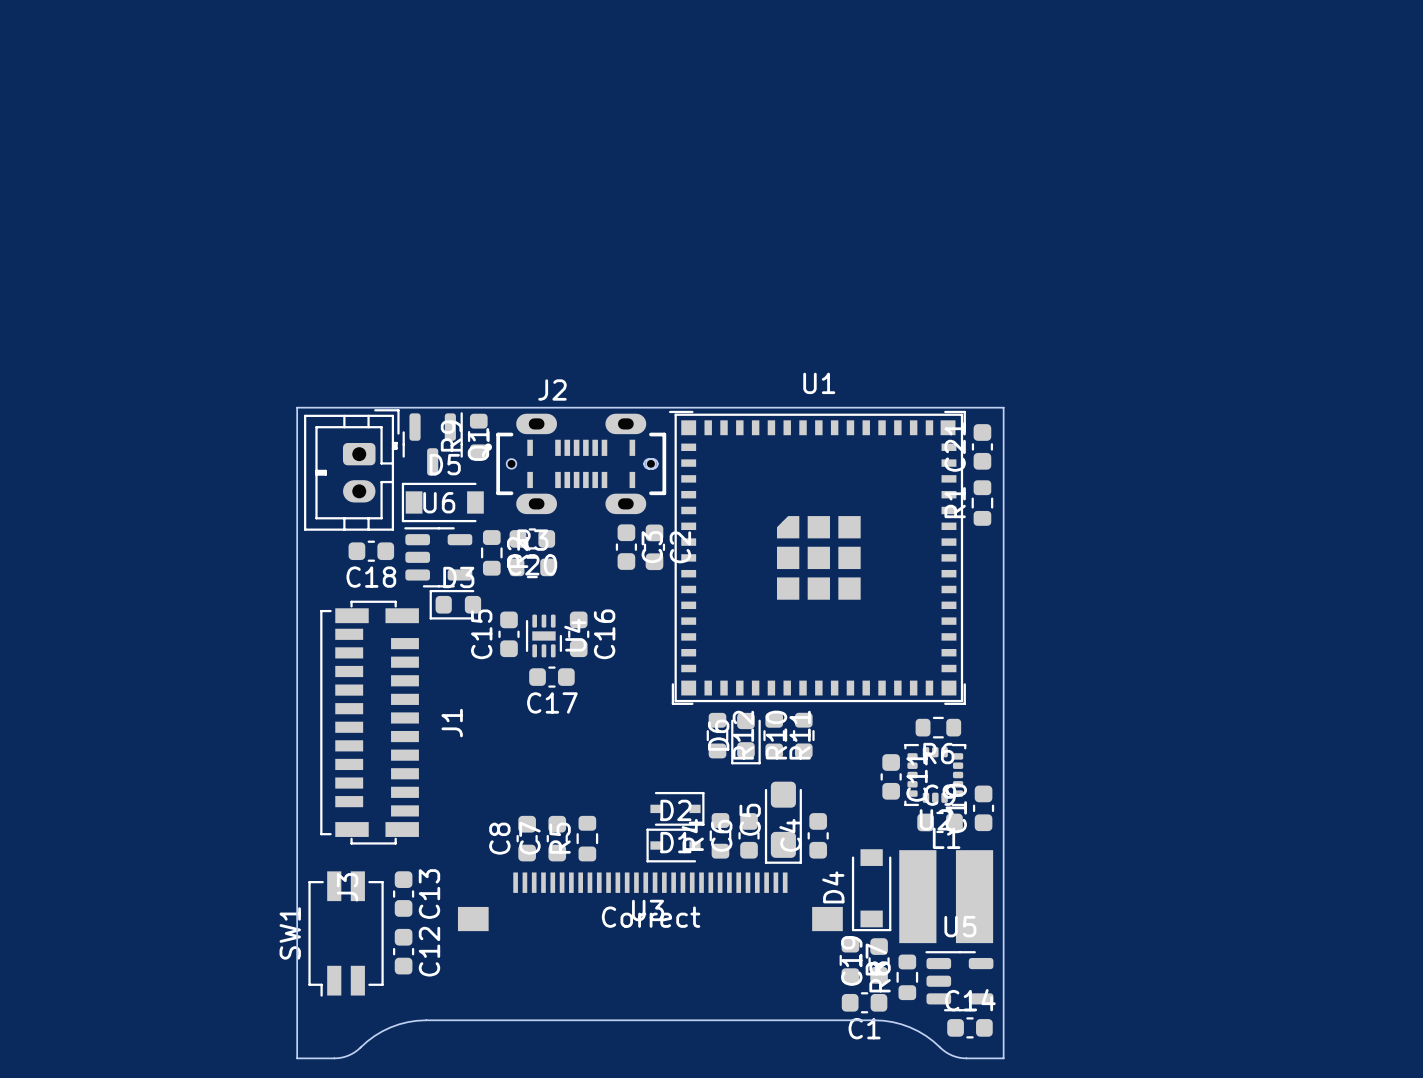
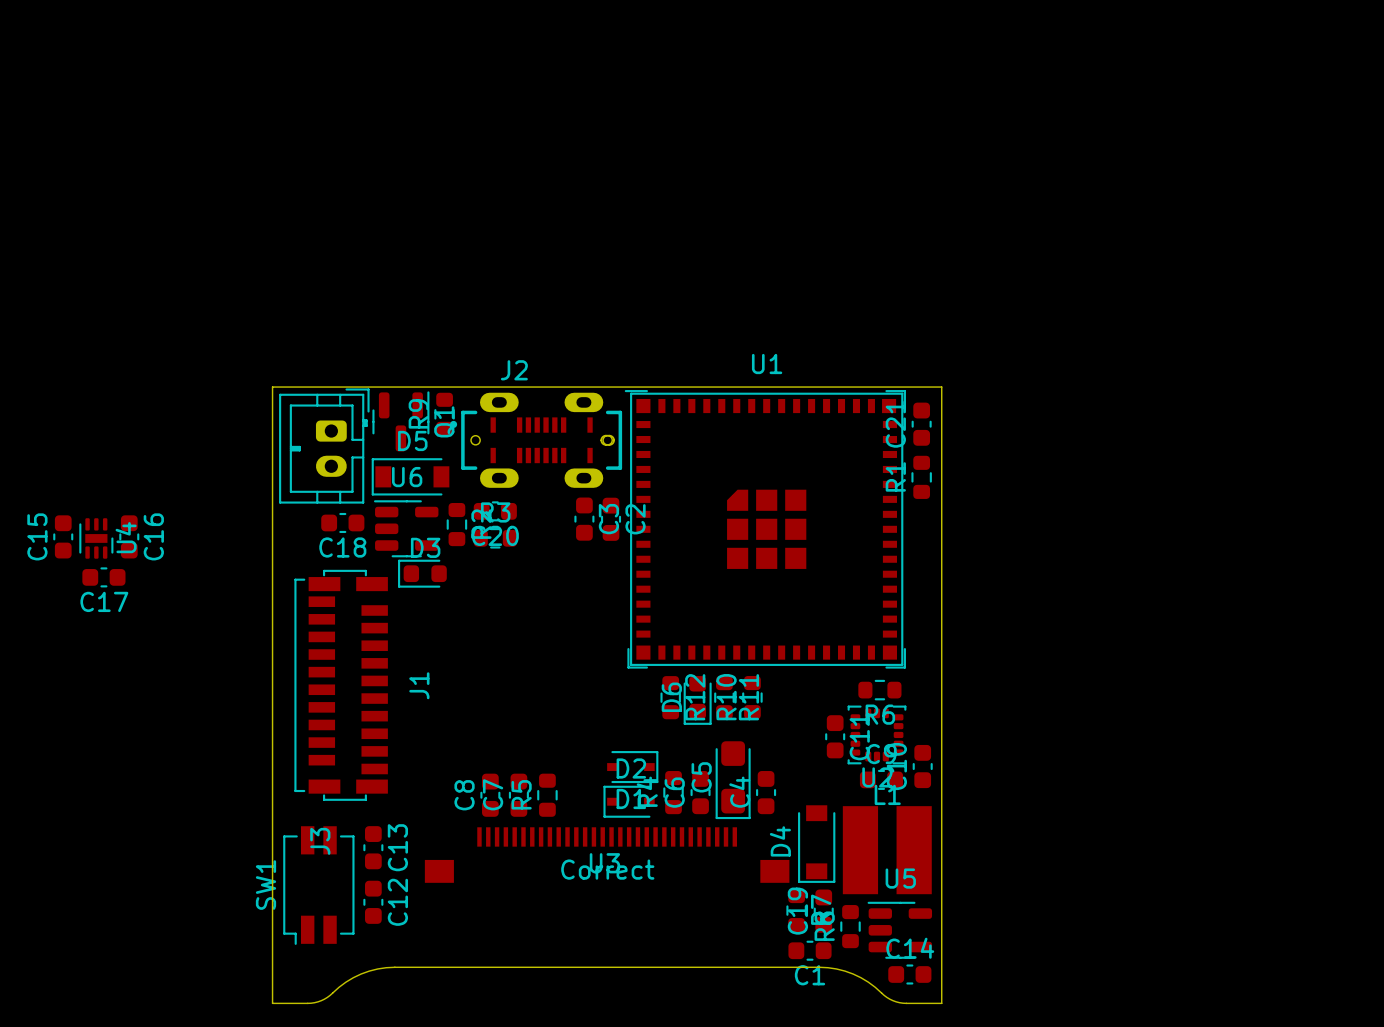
C15 position: (509, 634) -> (63, 536)
C16 position: (578, 634) -> (129, 536)
U4 position: (543, 635) -> (96, 538)
C17 position: (551, 677) -> (103, 577)

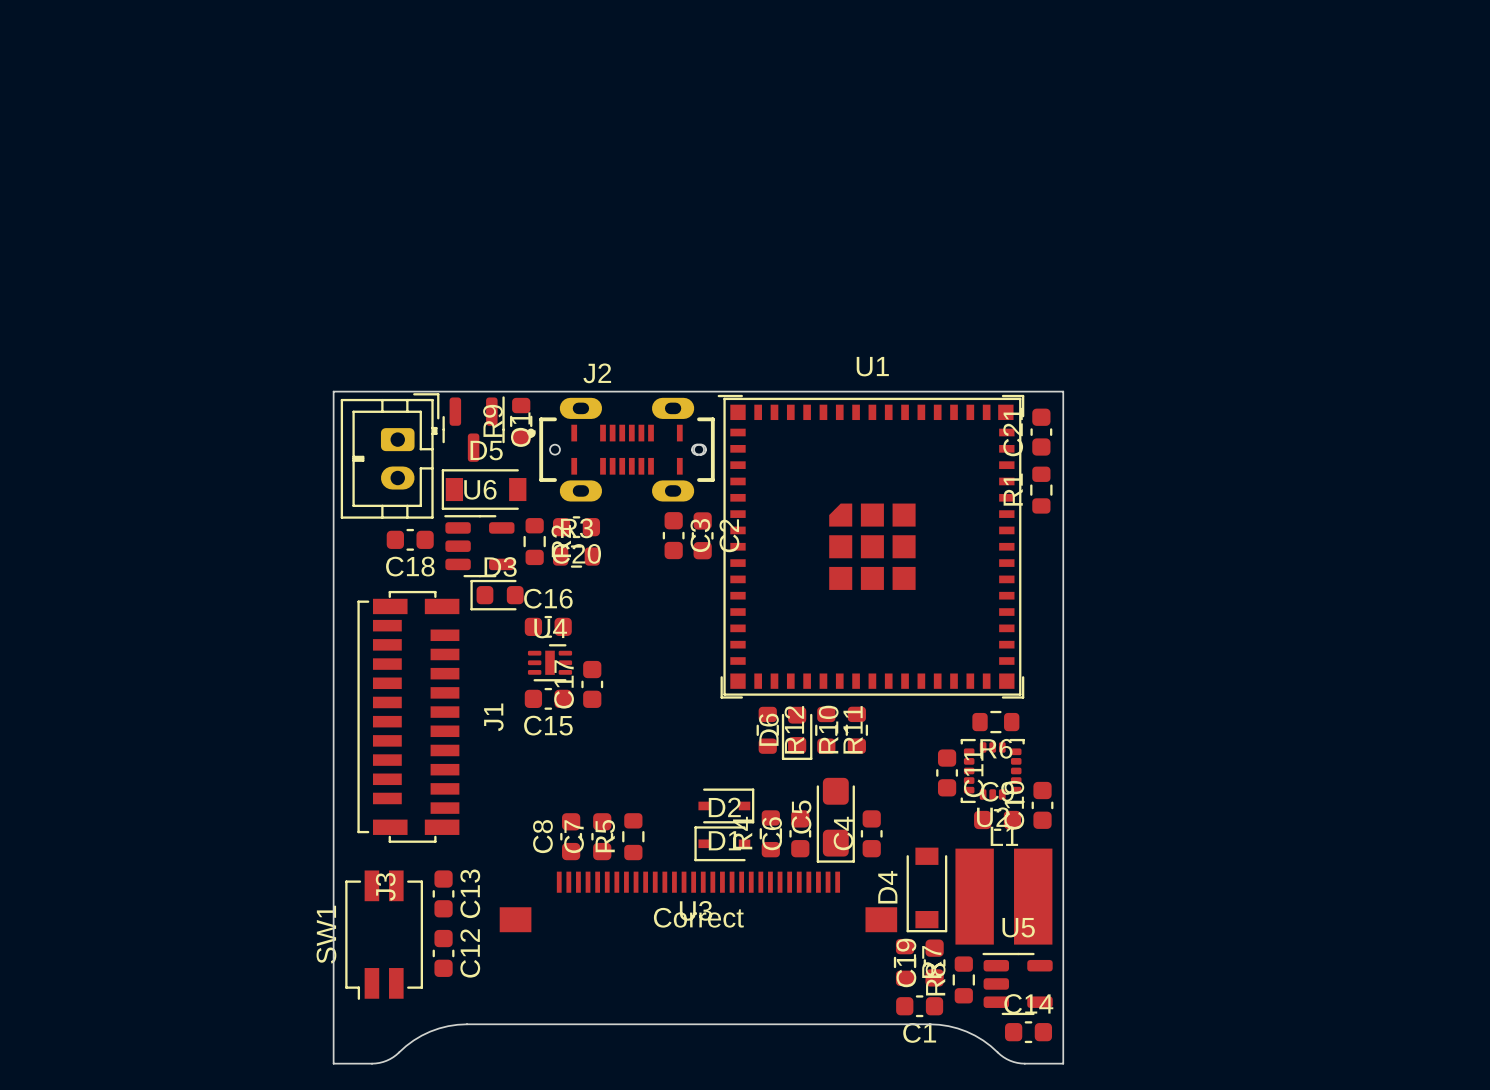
C15 name position: C15 (37, 536) -> C15 (548, 725)
C15 rotation: 0° (63, 536) -> 90° clockwise (548, 698)
C15 position: (63, 536) -> (548, 698)
C16 rotation: 0° (129, 536) -> 90° clockwise (548, 626)
C16 position: (129, 536) -> (548, 626)
C16 name position: C16 (153, 536) -> C16 (548, 598)
U4 rotation: 0° (96, 538) -> 90° counterclockwise (550, 662)
U4 position: (96, 538) -> (550, 662)
C17 rotation: 0° (103, 577) -> 90° clockwise (592, 684)
C17 position: (103, 577) -> (592, 684)

